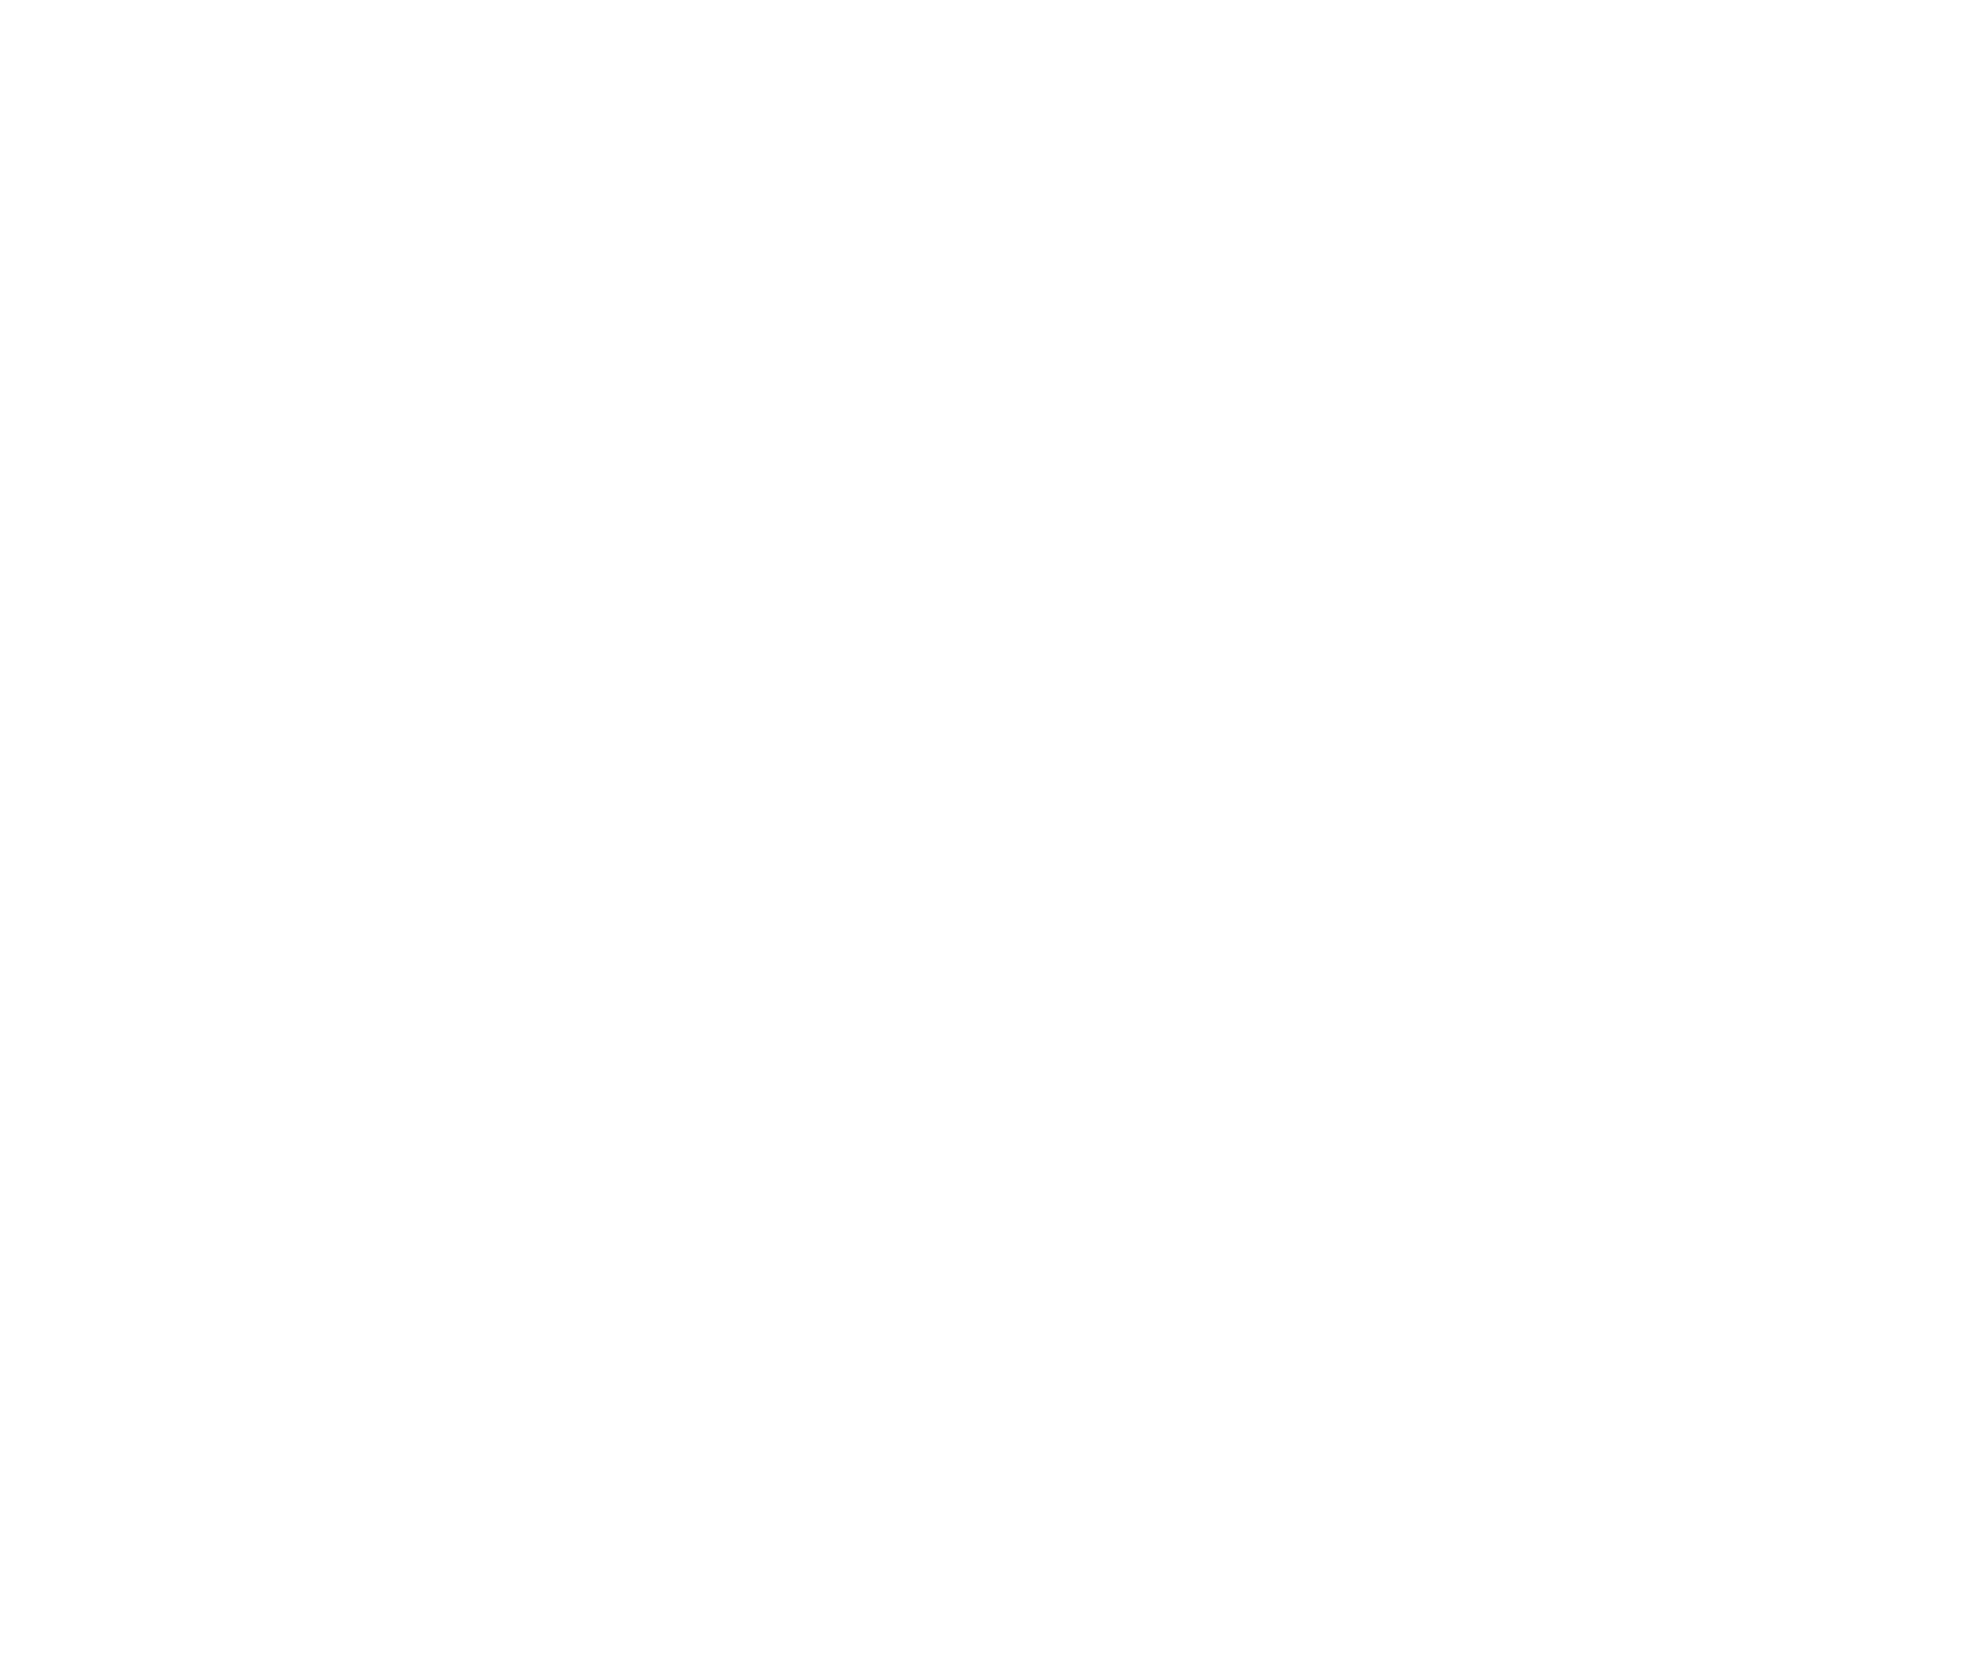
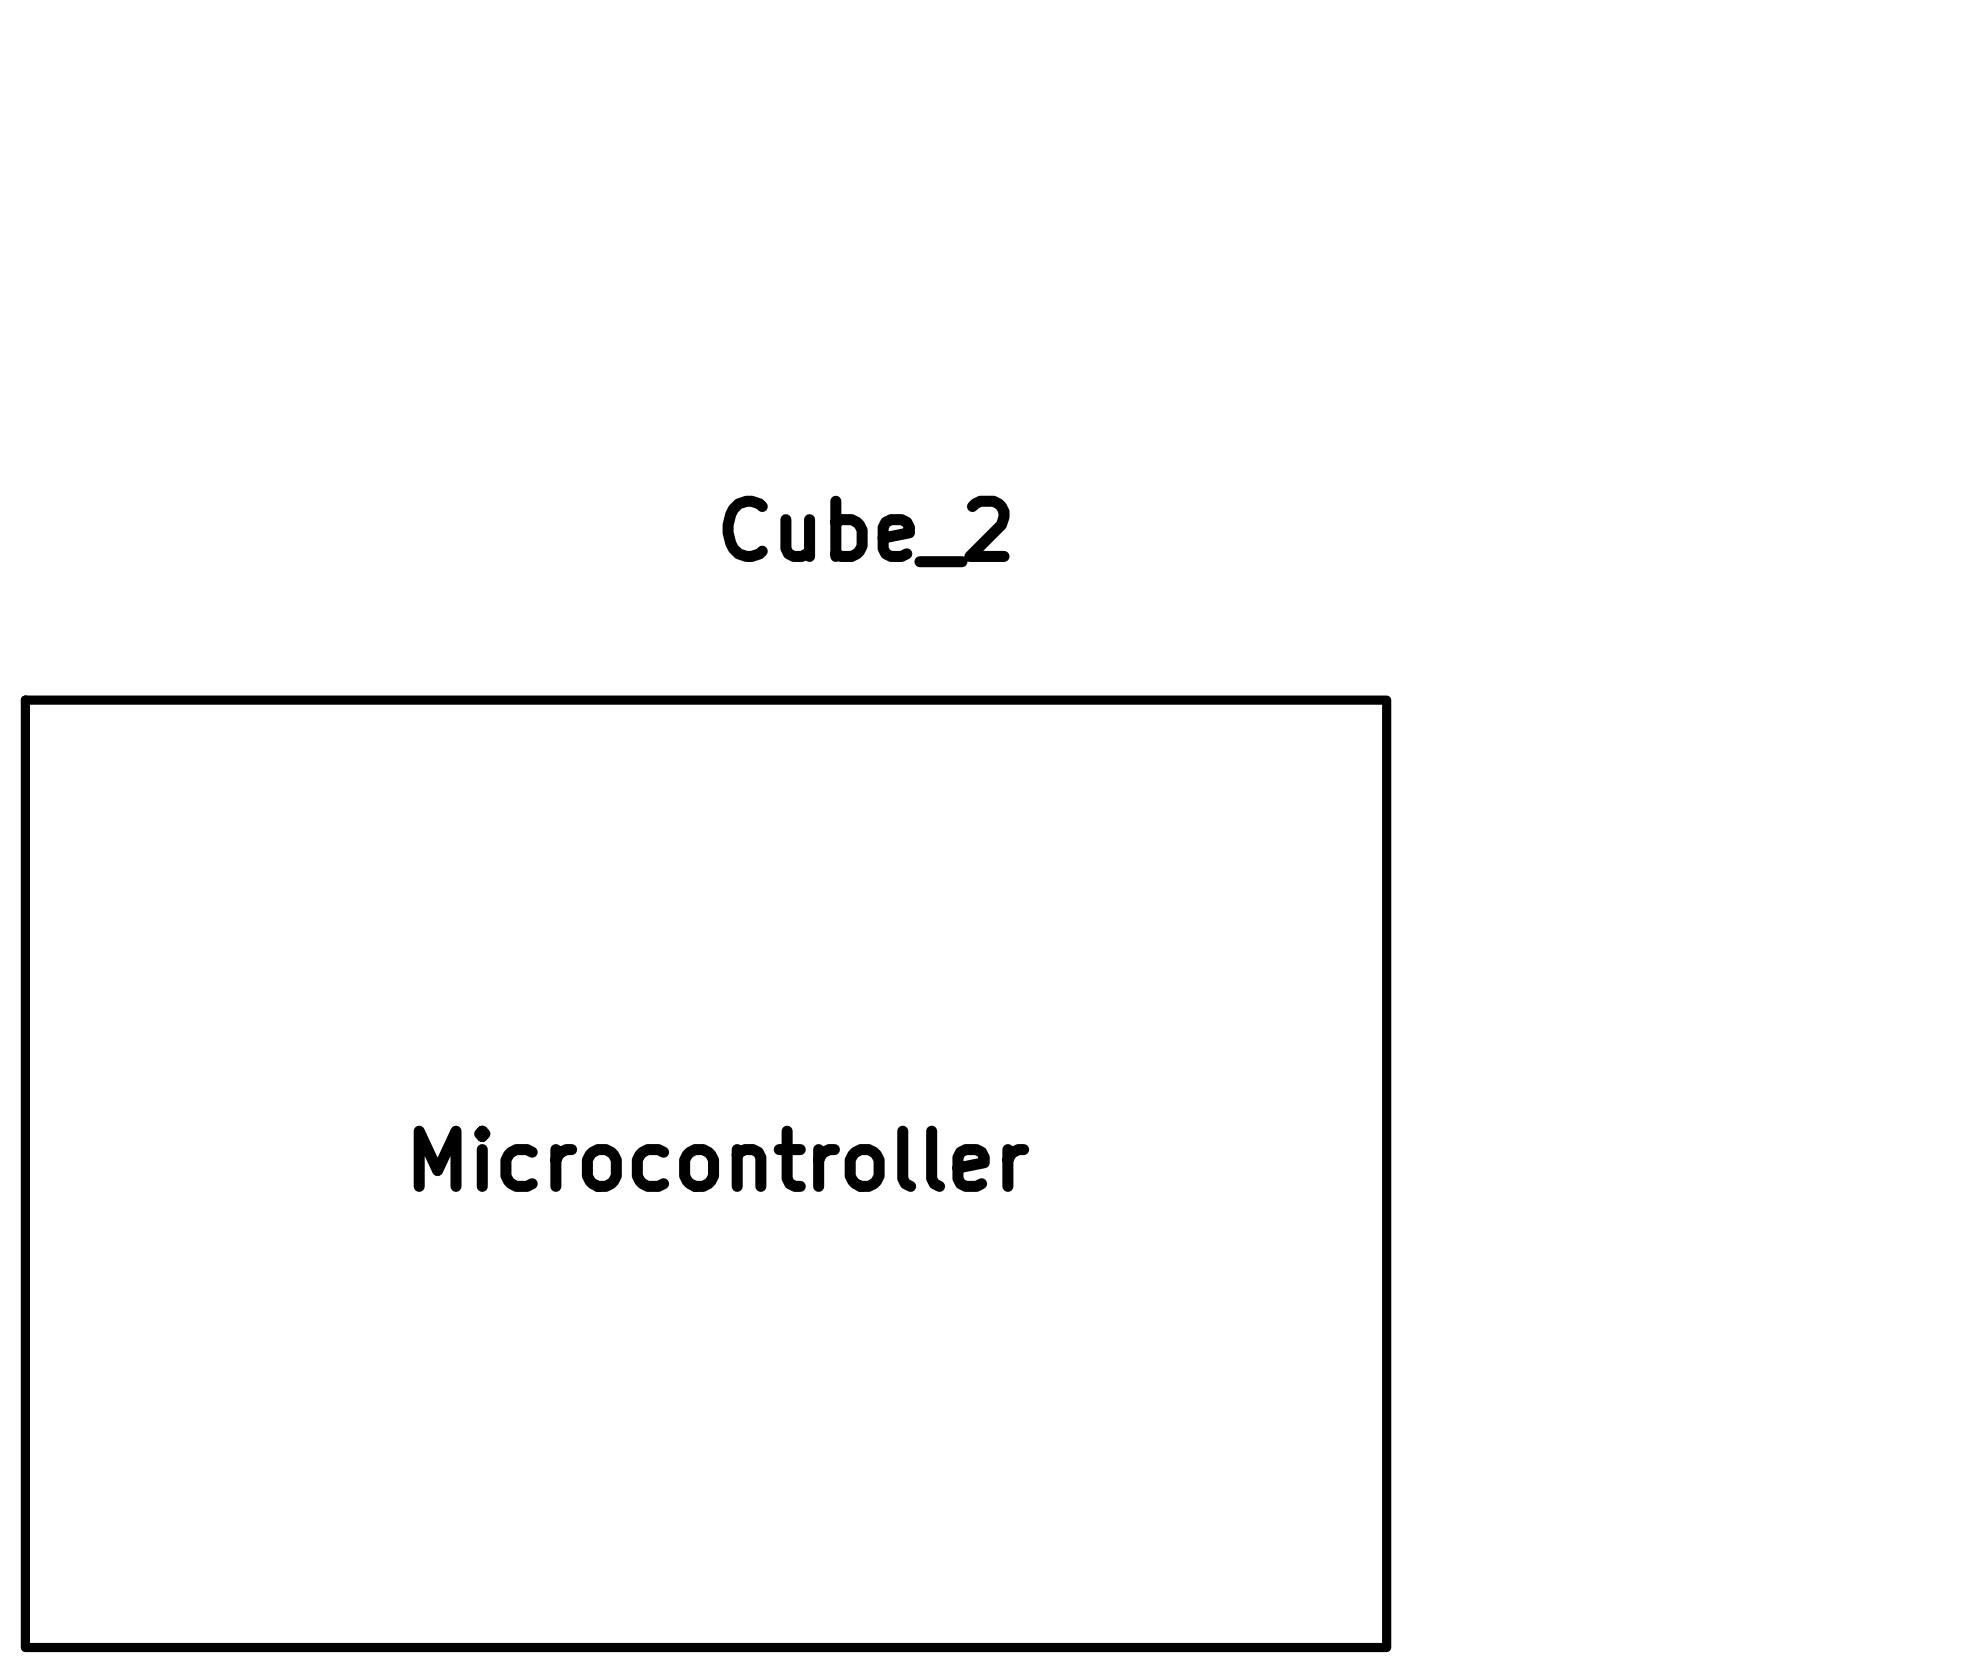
text: none -> Cube_2 (866, 531)
sheet Microcontroller: none -> (706, 1173)

